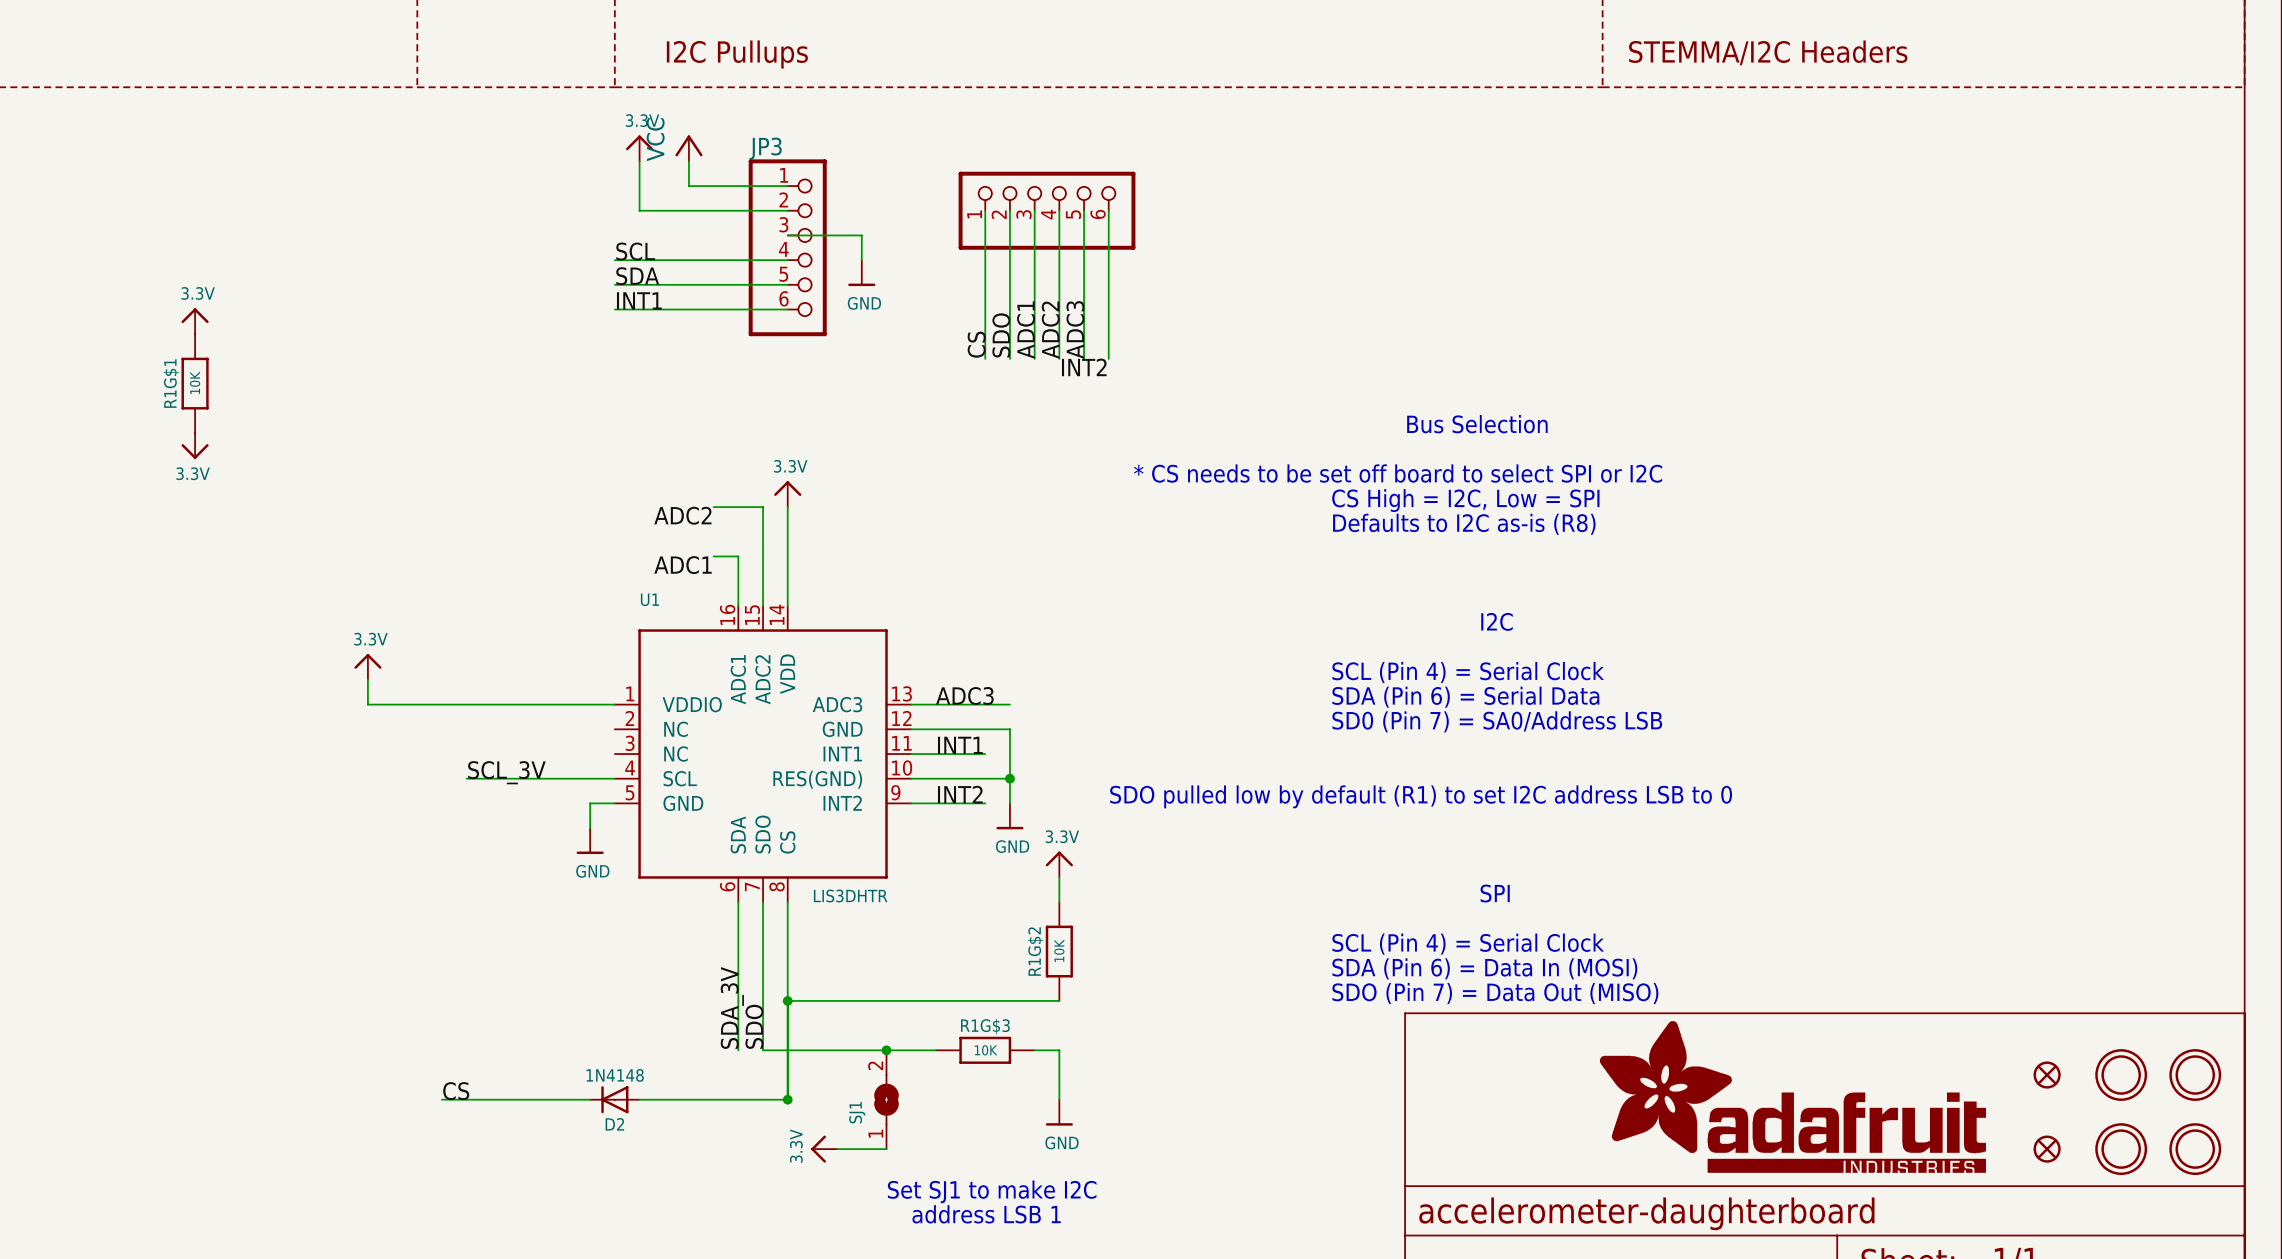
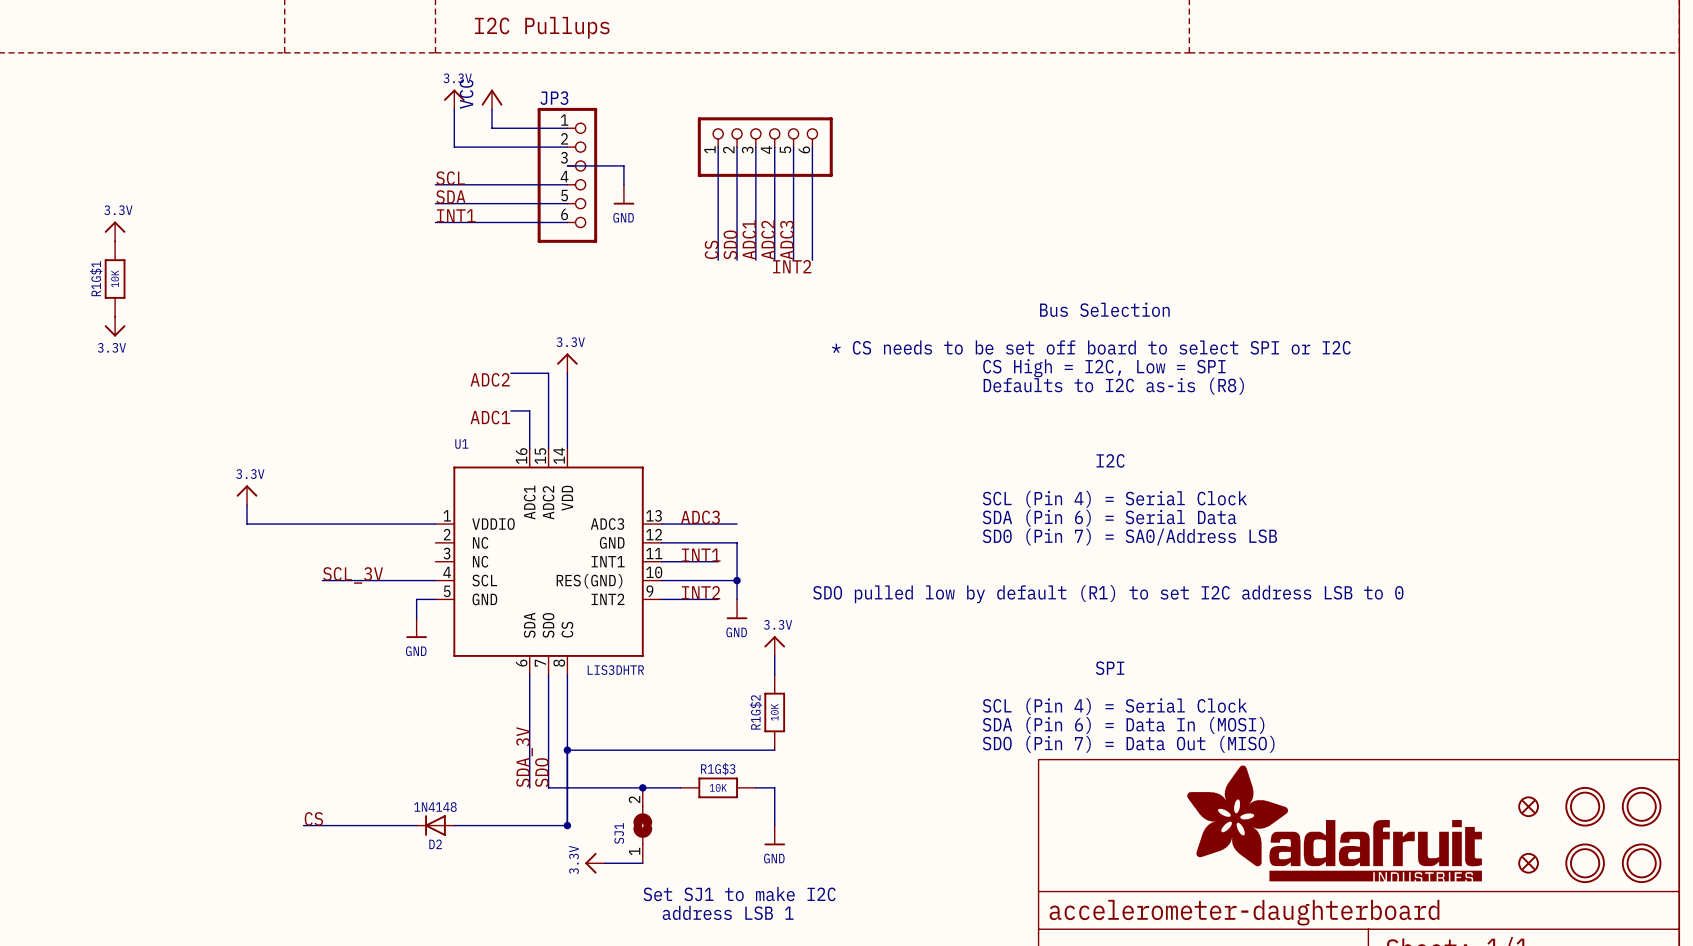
text: STEMMA/I2C Headers (1768, 52) -> none

